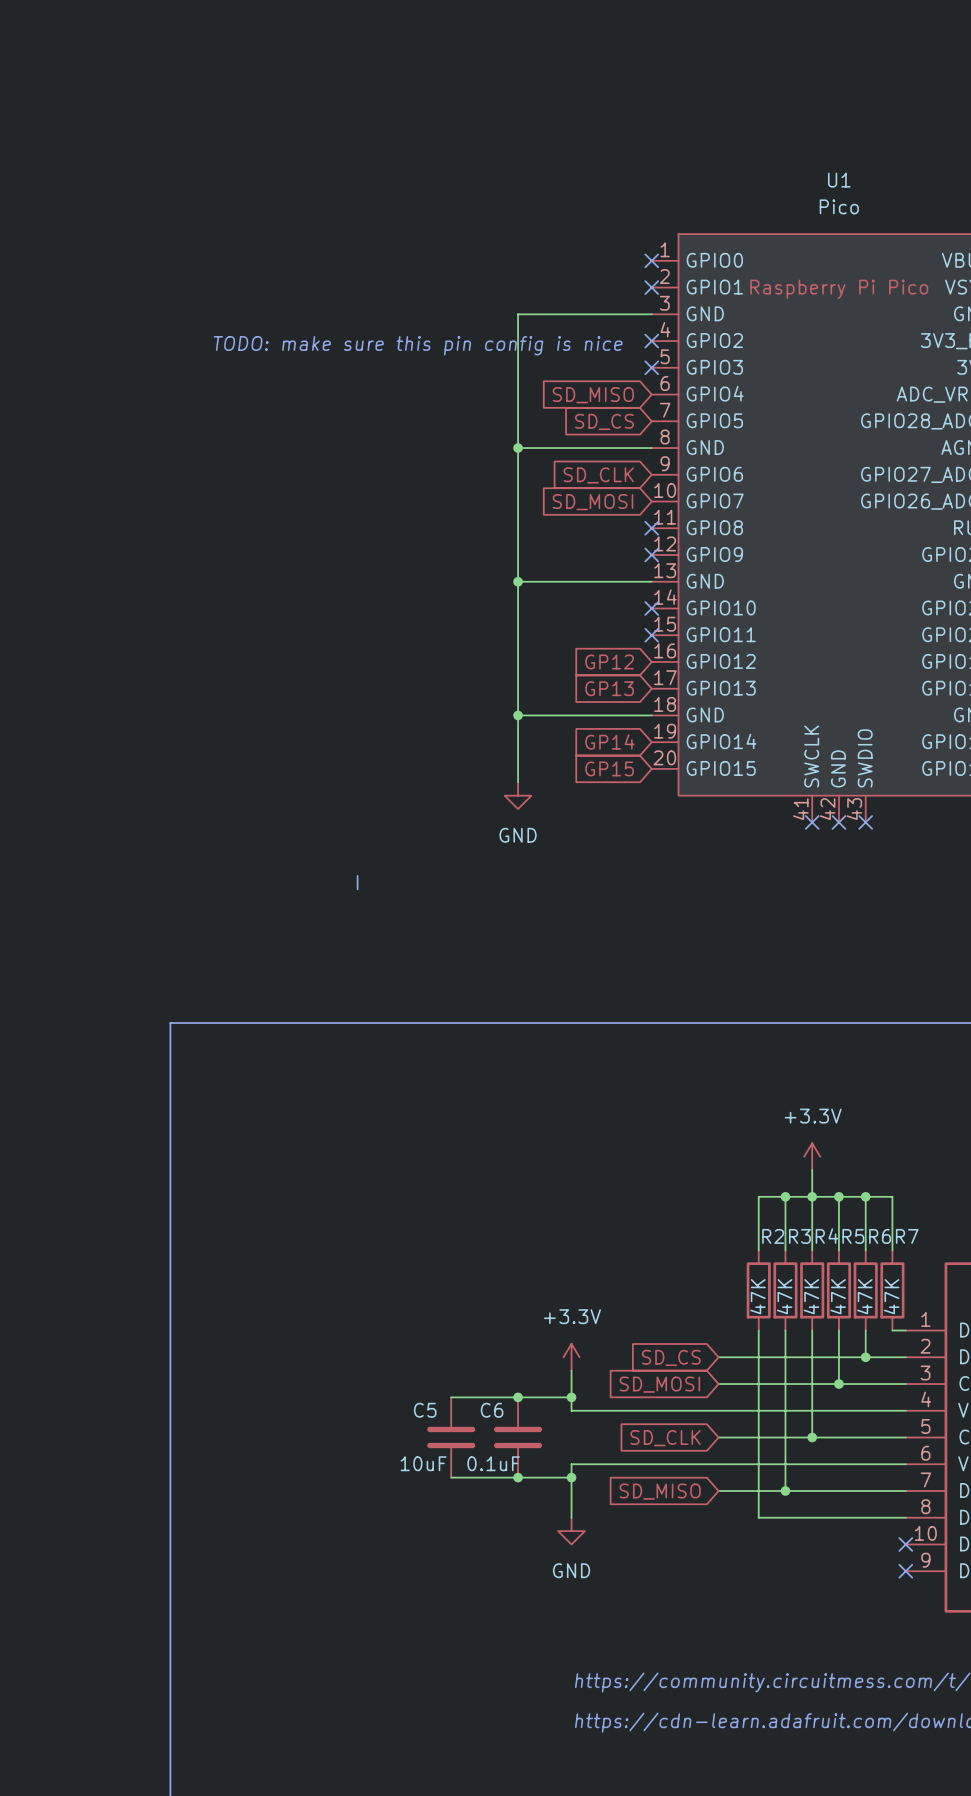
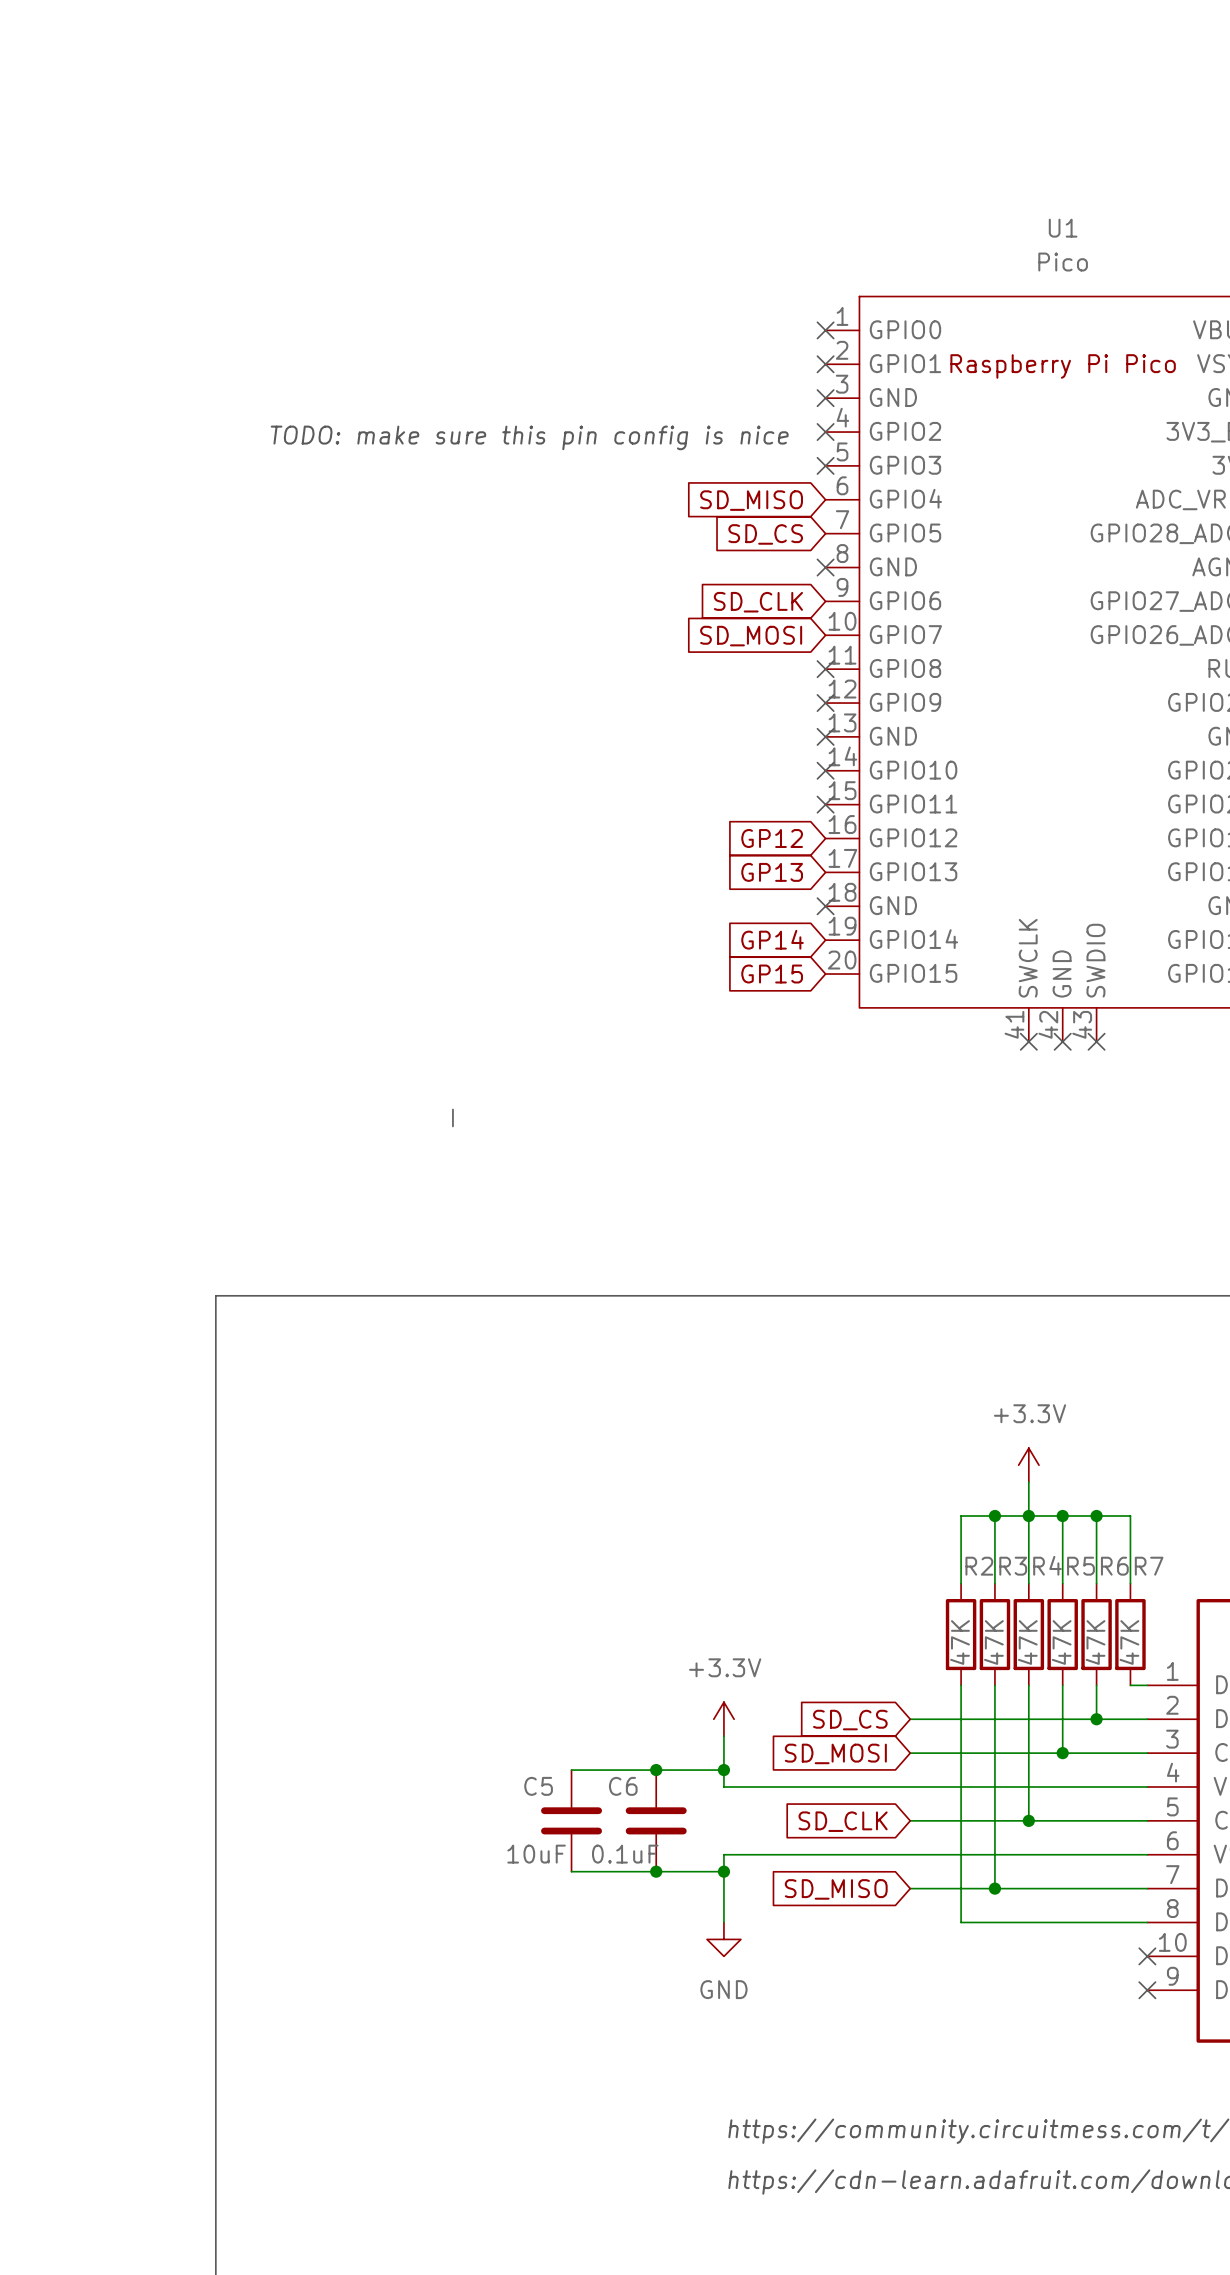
wire: (651, 314) (518, 314) (518, 782) -> none
no-connect mark: none -> (825, 398)
wire: (518, 448) (651, 448) -> none
junction: (518, 448) -> none
no-connect mark: none -> (825, 567)
wire: (518, 581) (651, 581) -> none
junction: (518, 581) -> none
no-connect mark: none -> (825, 736)
wire: (518, 715) (651, 715) -> none
junction: (518, 715) -> none
no-connect mark: none -> (825, 906)
power symbol: GND (518, 795) -> none

